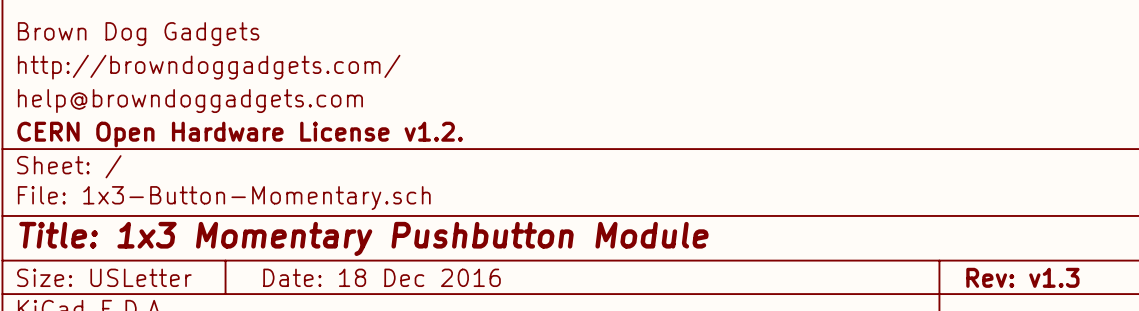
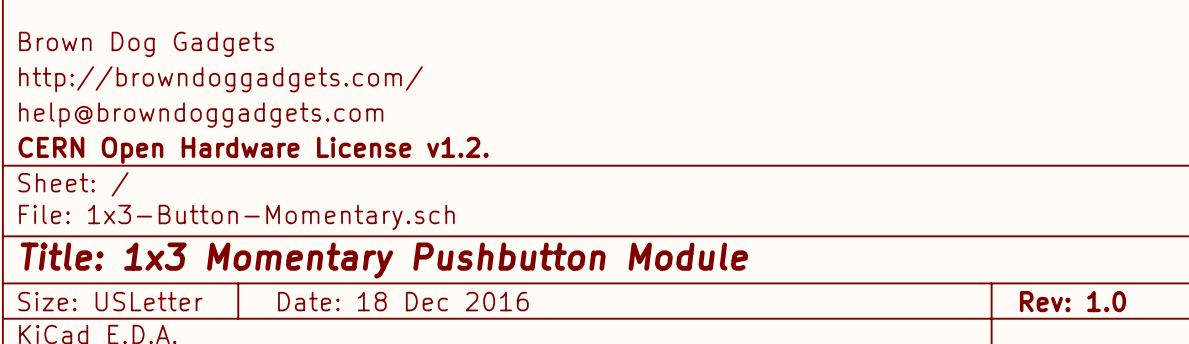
title block: Rev: v1.3 (1022, 277) -> Rev: 1.0 (1072, 301)

